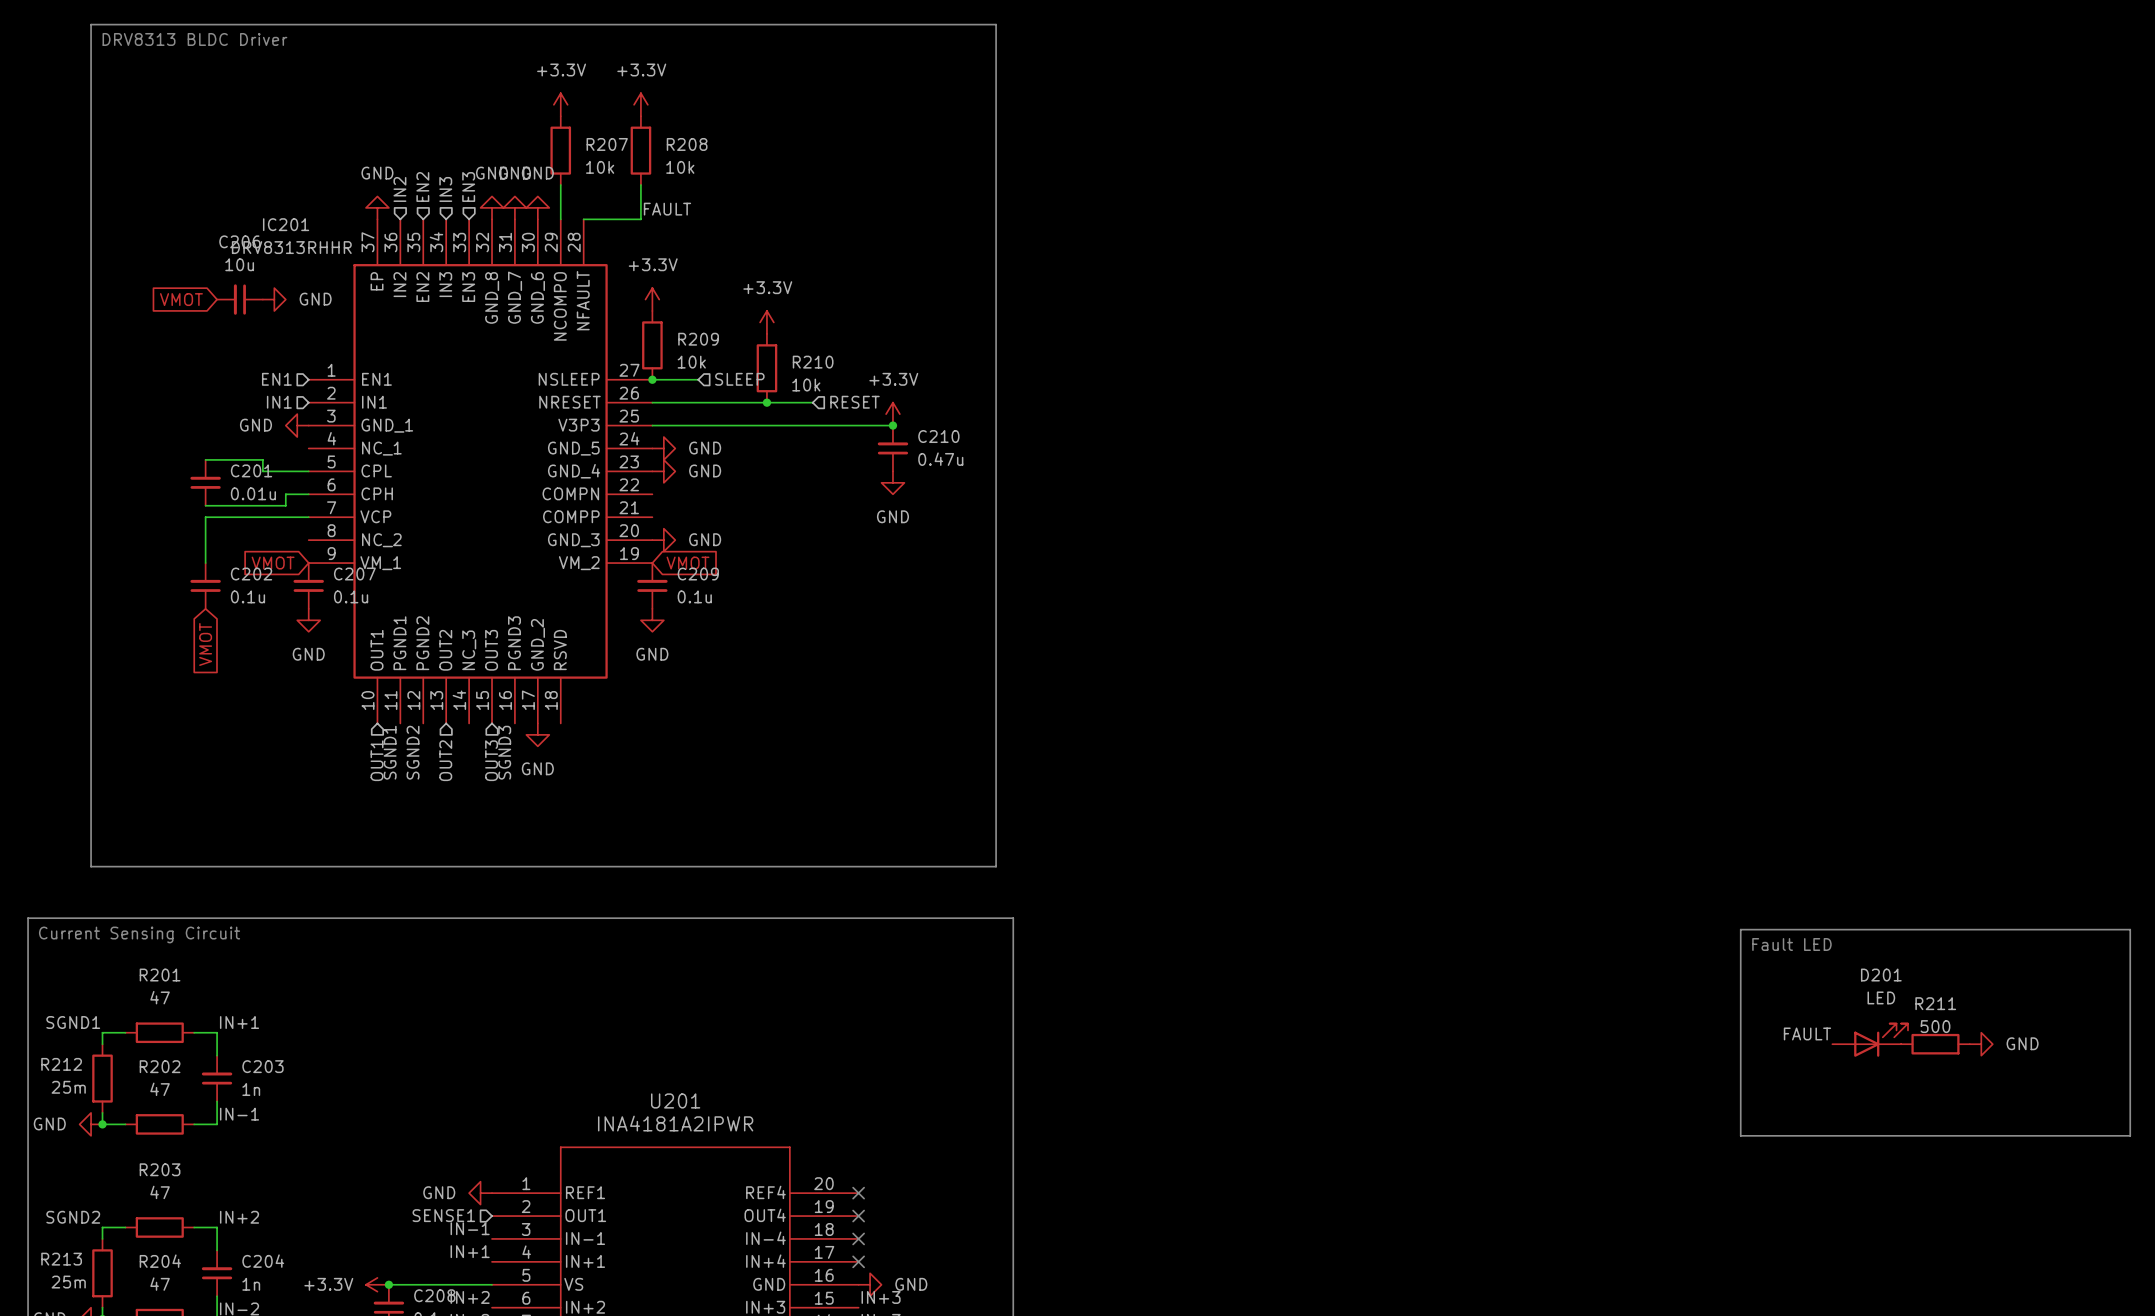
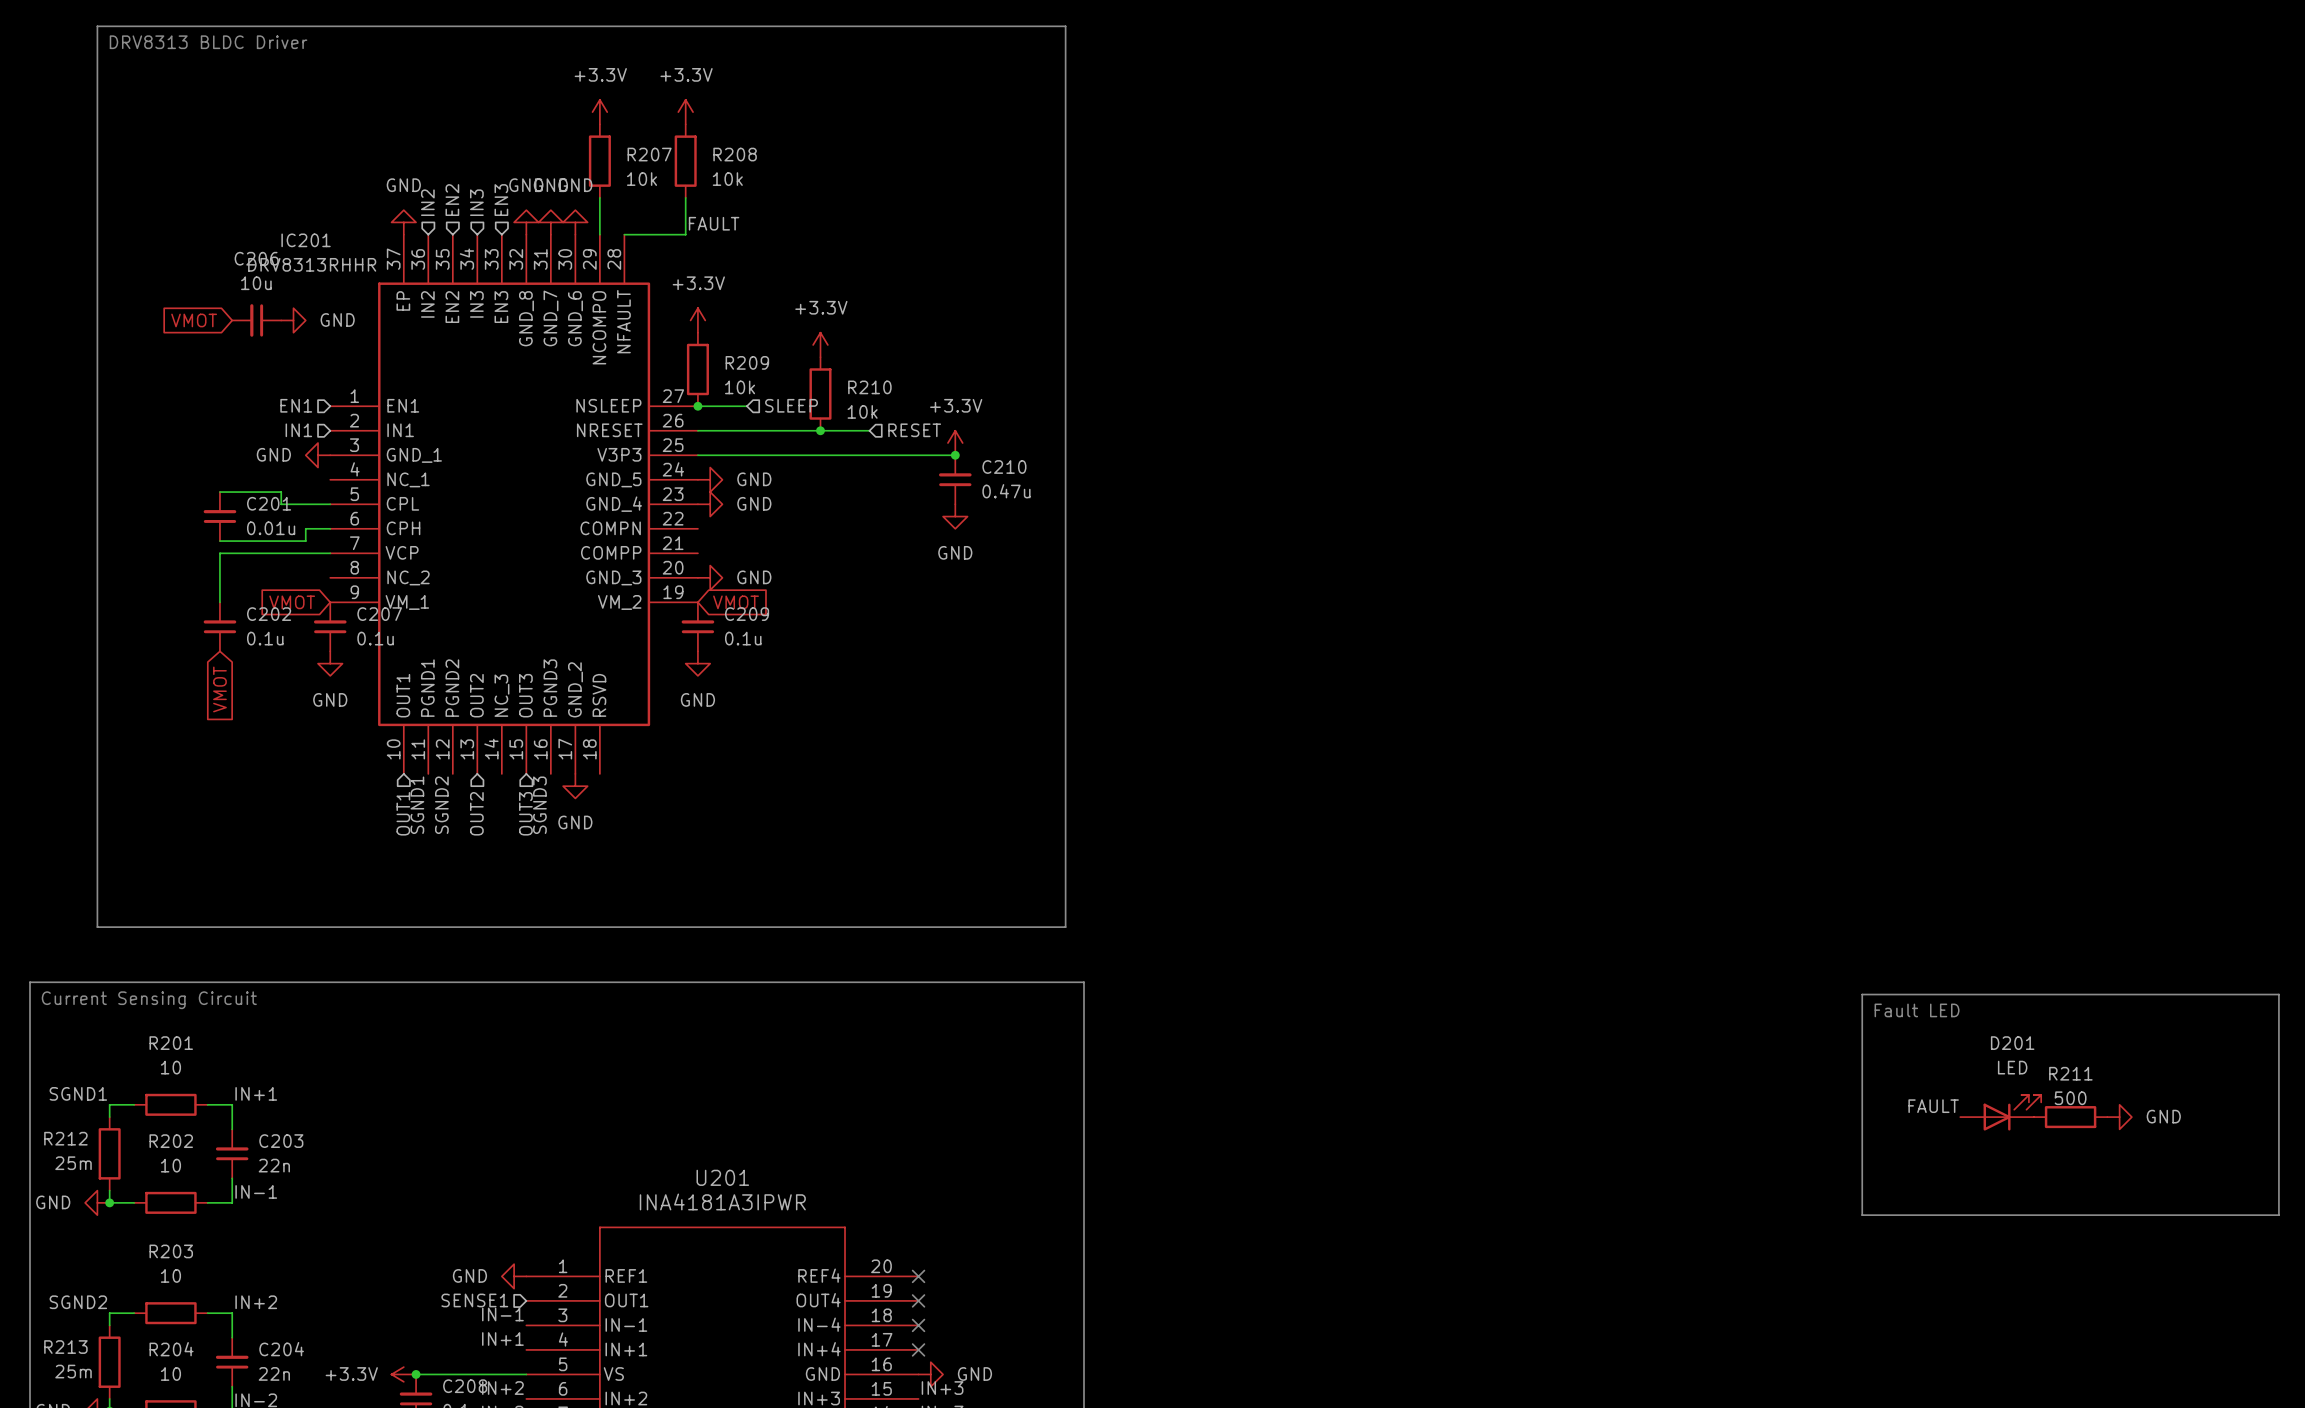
R201 value: 47 (160, 997) -> 10 (170, 1067)
R202 value: 47 (160, 1089) -> 10 (170, 1165)
C203 value: 1n (251, 1089) -> 22n (274, 1165)
U201 value: INA4181A2IPWR (675, 1123) -> INA4181A3IPWR (722, 1201)
R203 value: 47 (160, 1192) -> 10 (170, 1275)
R204 value: 47 (160, 1284) -> 10 (170, 1374)
C204 value: 1n (251, 1284) -> 22n (274, 1373)

